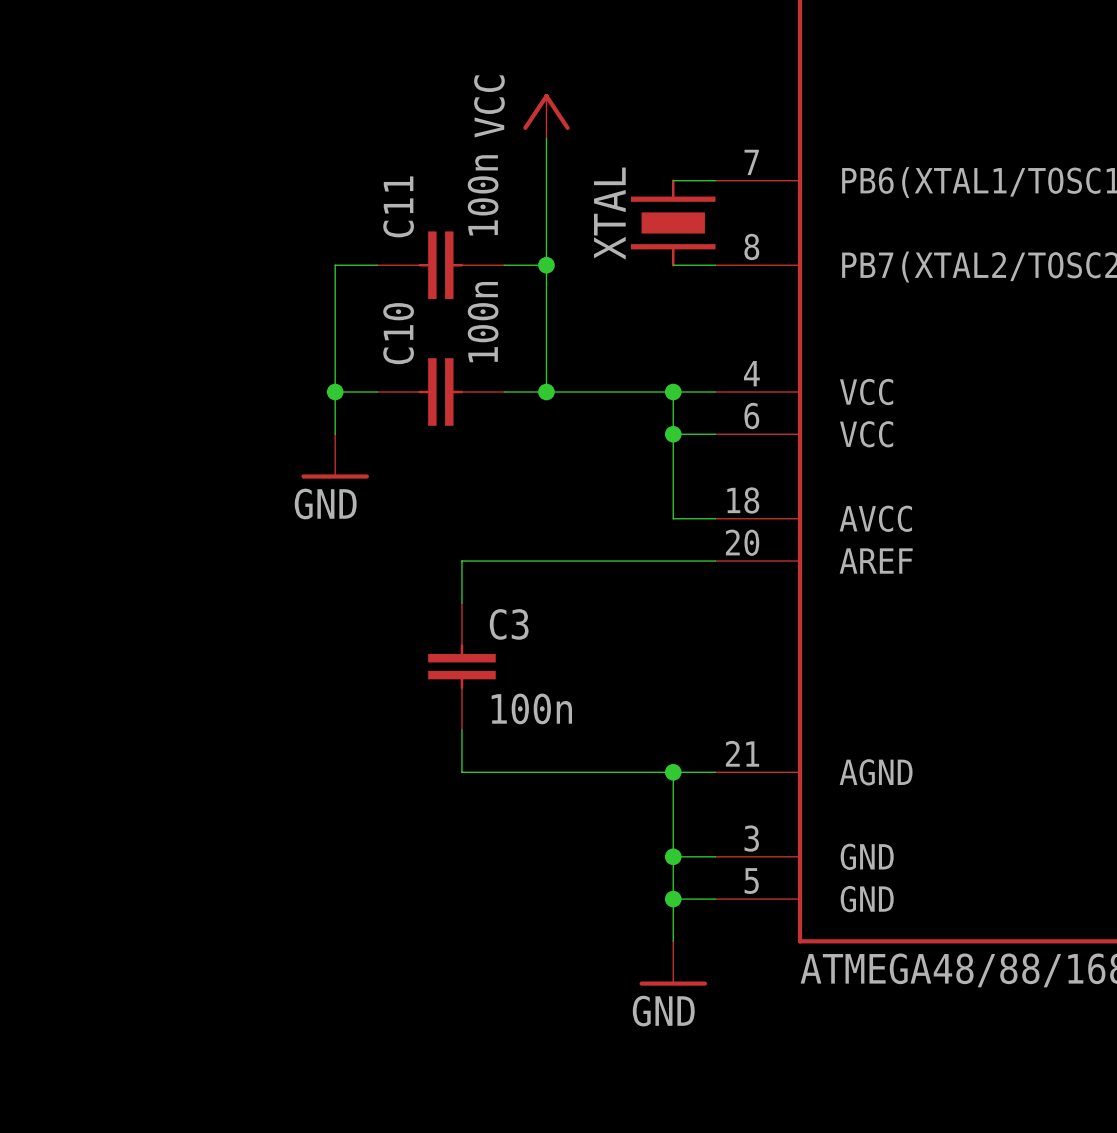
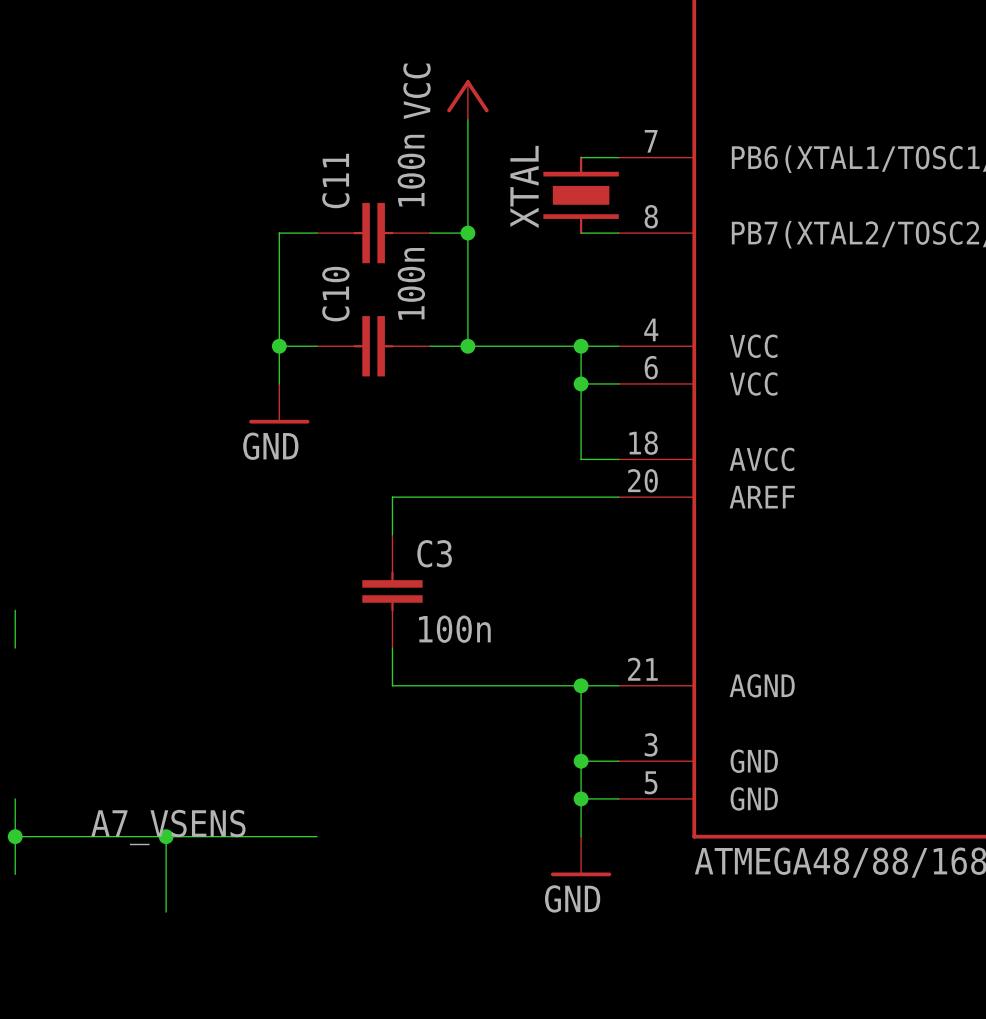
wire: none -> (15, 610) (15, 648)
wire: none -> (15, 798) (15, 874)
label: none -> A7_VSENS (168, 827)
wire: none -> (15, 836) (317, 836)
junction: none -> (15, 836)
wire: none -> (166, 836) (166, 912)
junction: none -> (166, 836)

